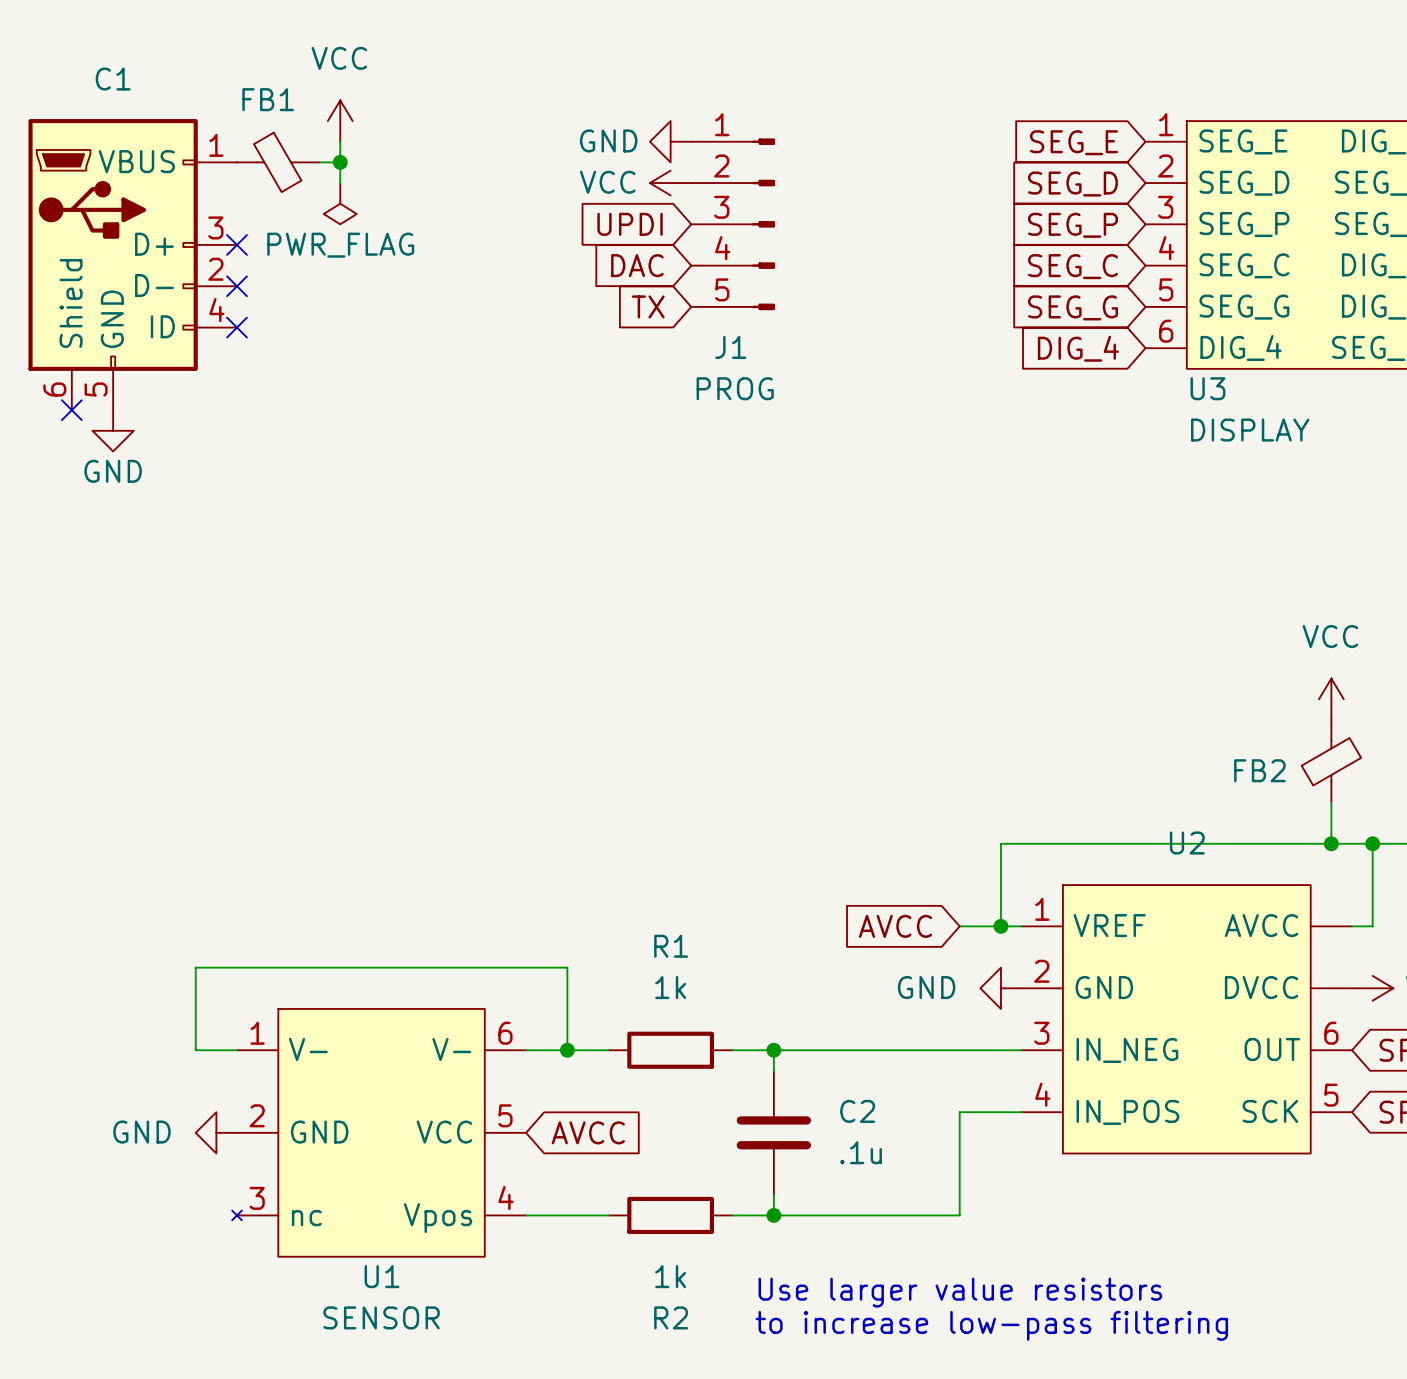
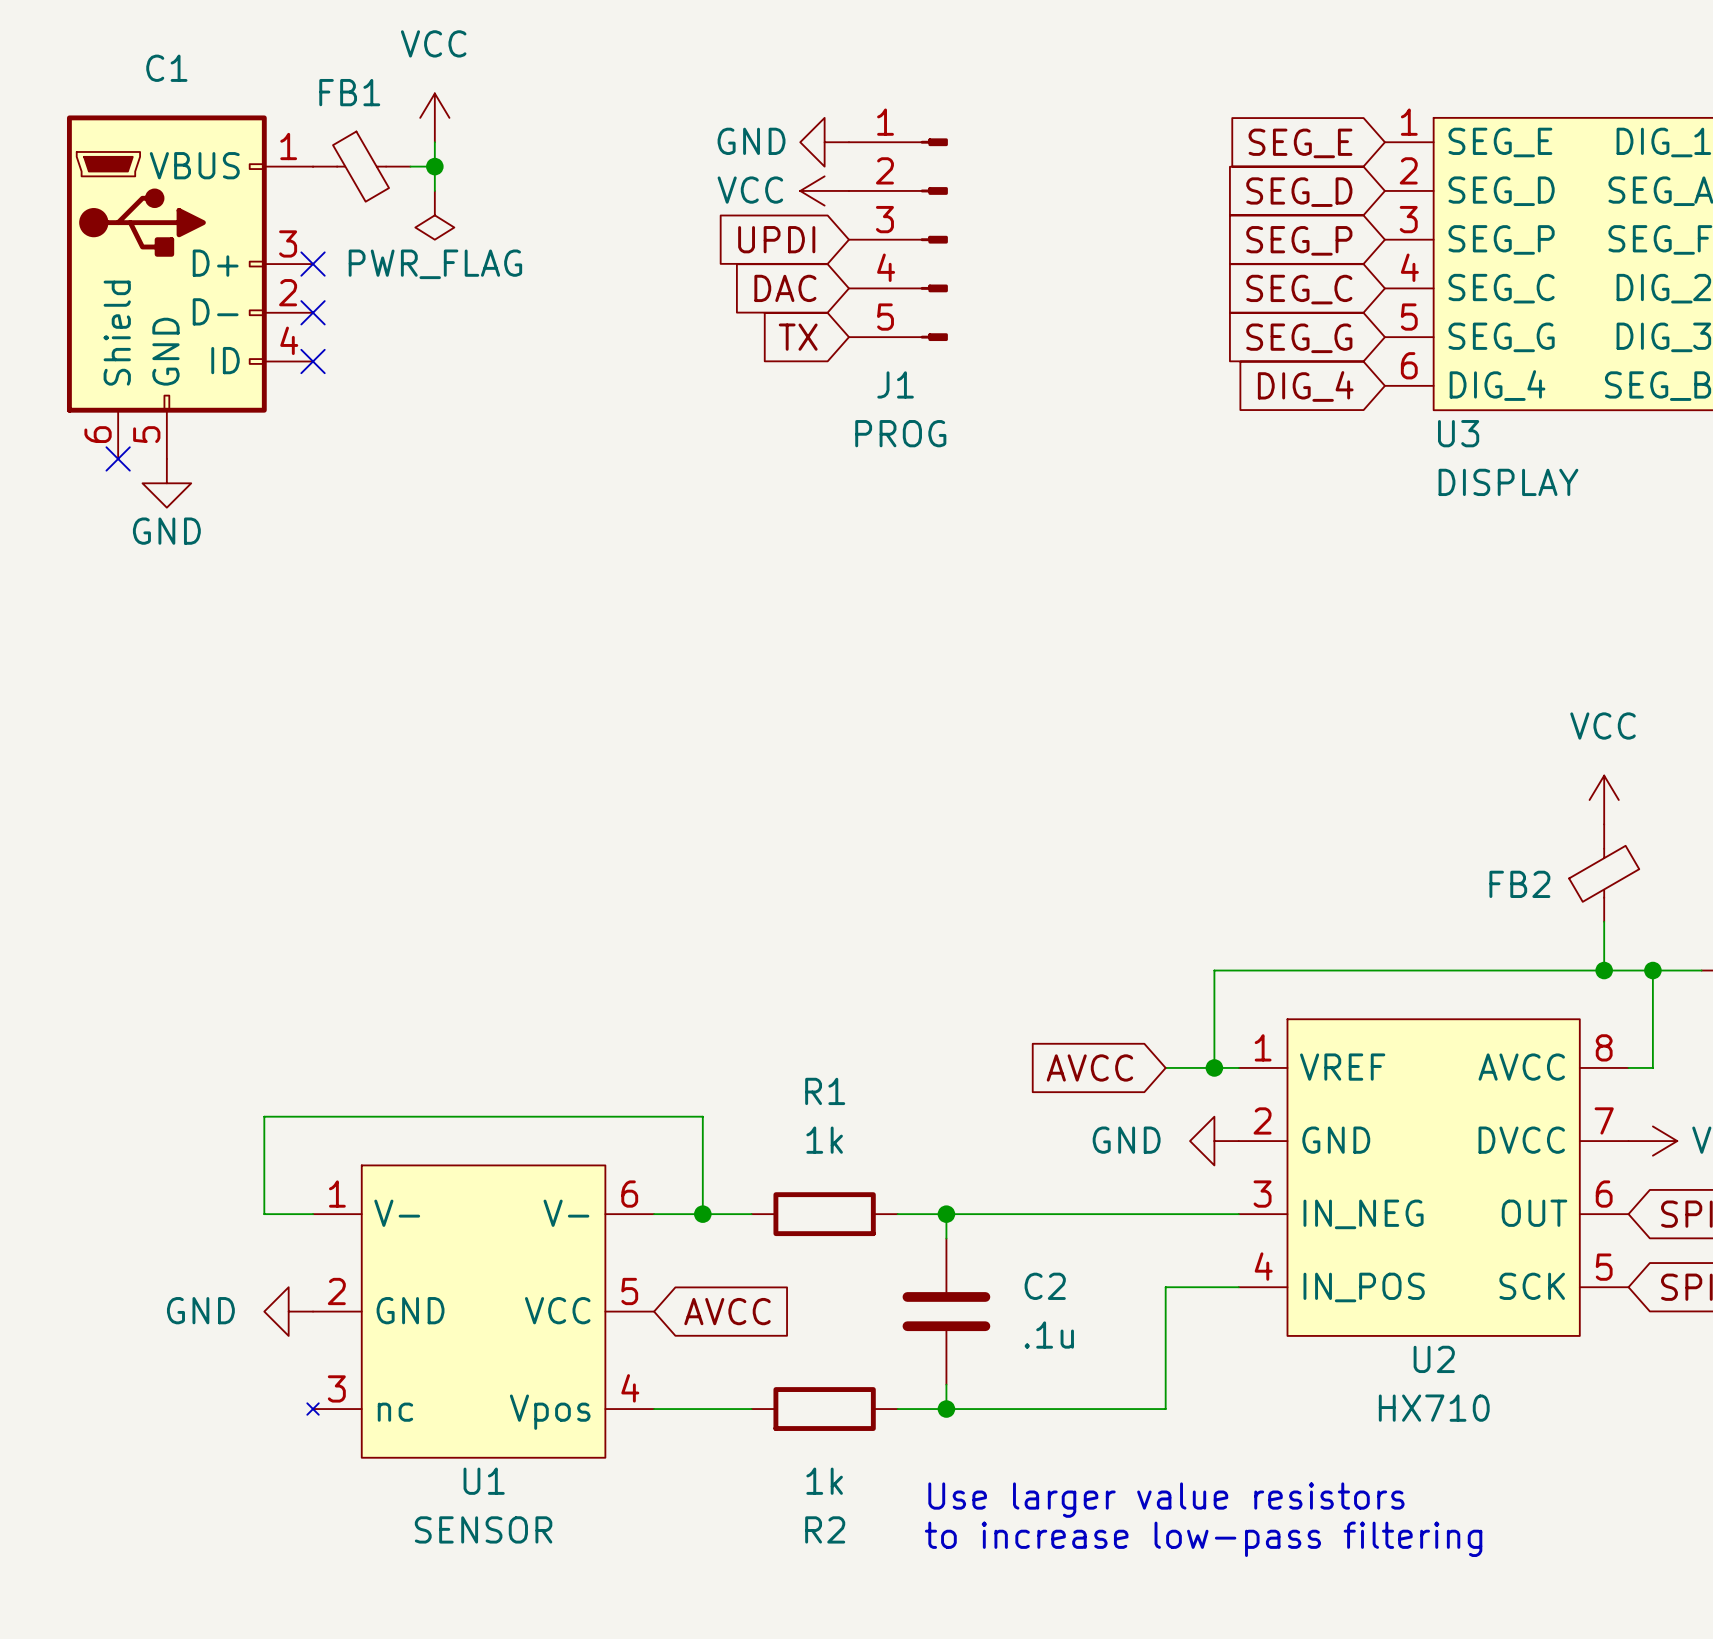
U2 name position: U2 (1187, 843) -> U2 (1434, 1359)
U2 pin number: none -> 8 (1604, 1047)
U2 pin number: none -> 7 (1604, 1120)
U2 value: none -> HX710 (1434, 1408)

